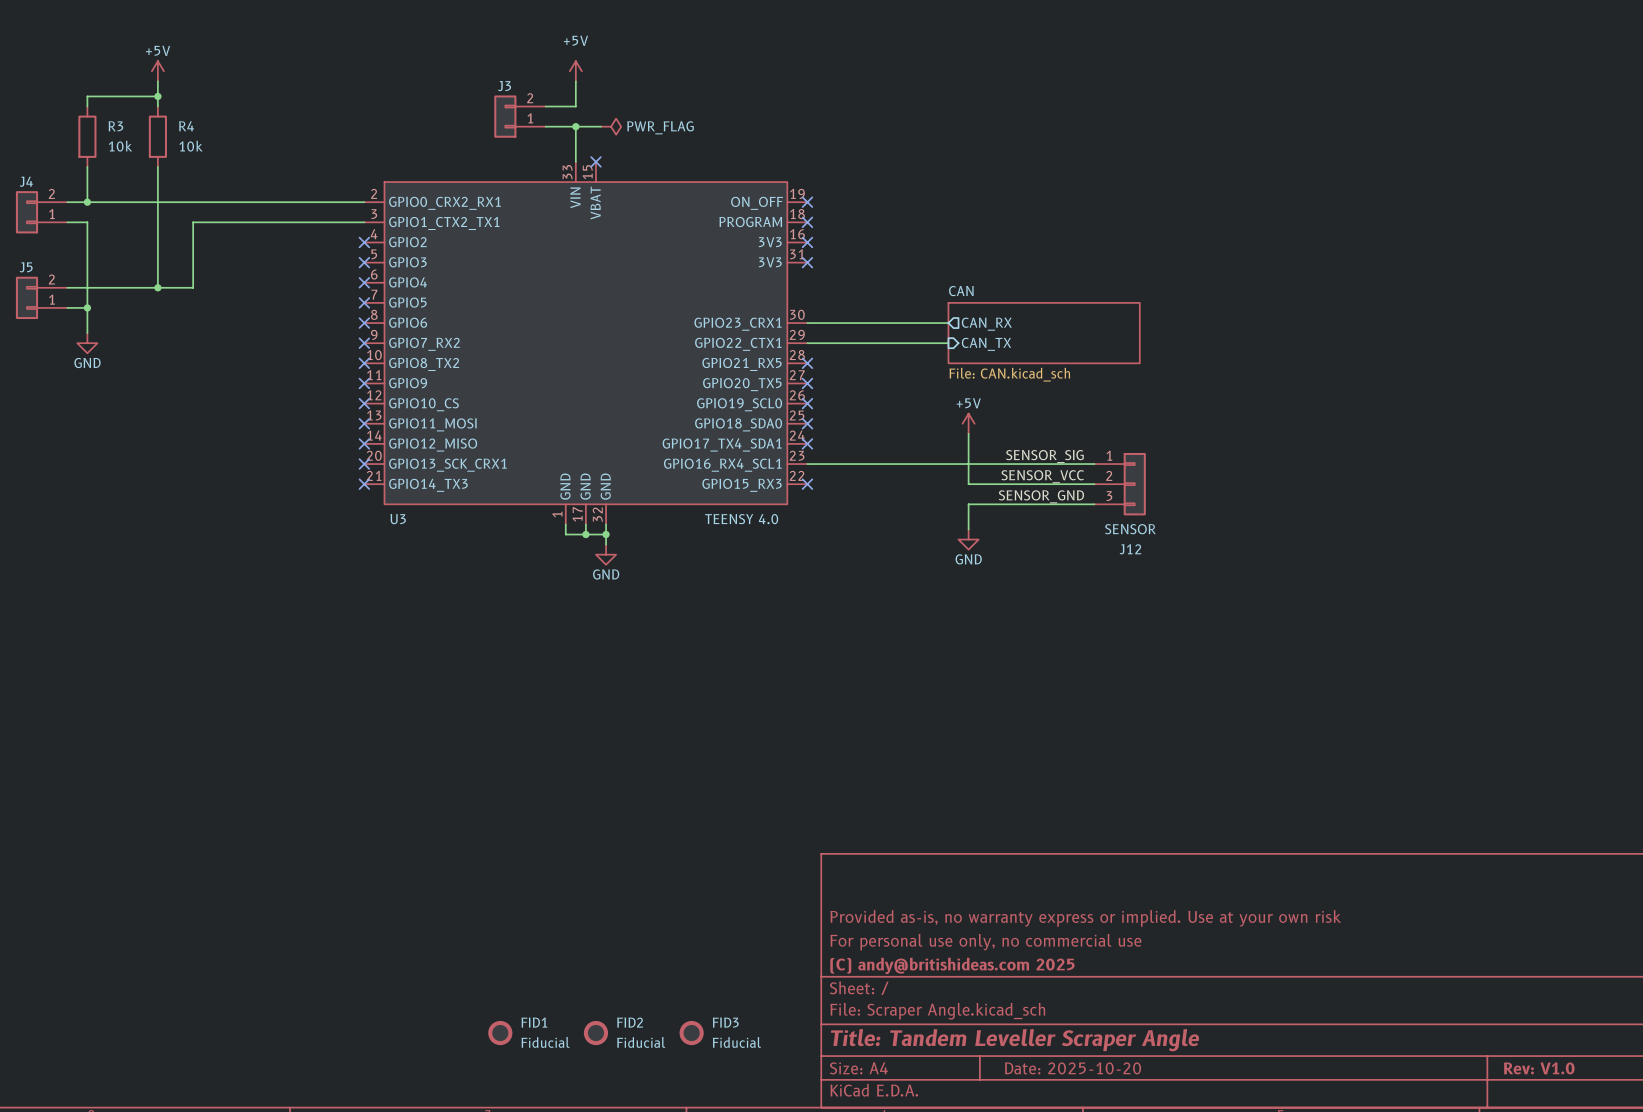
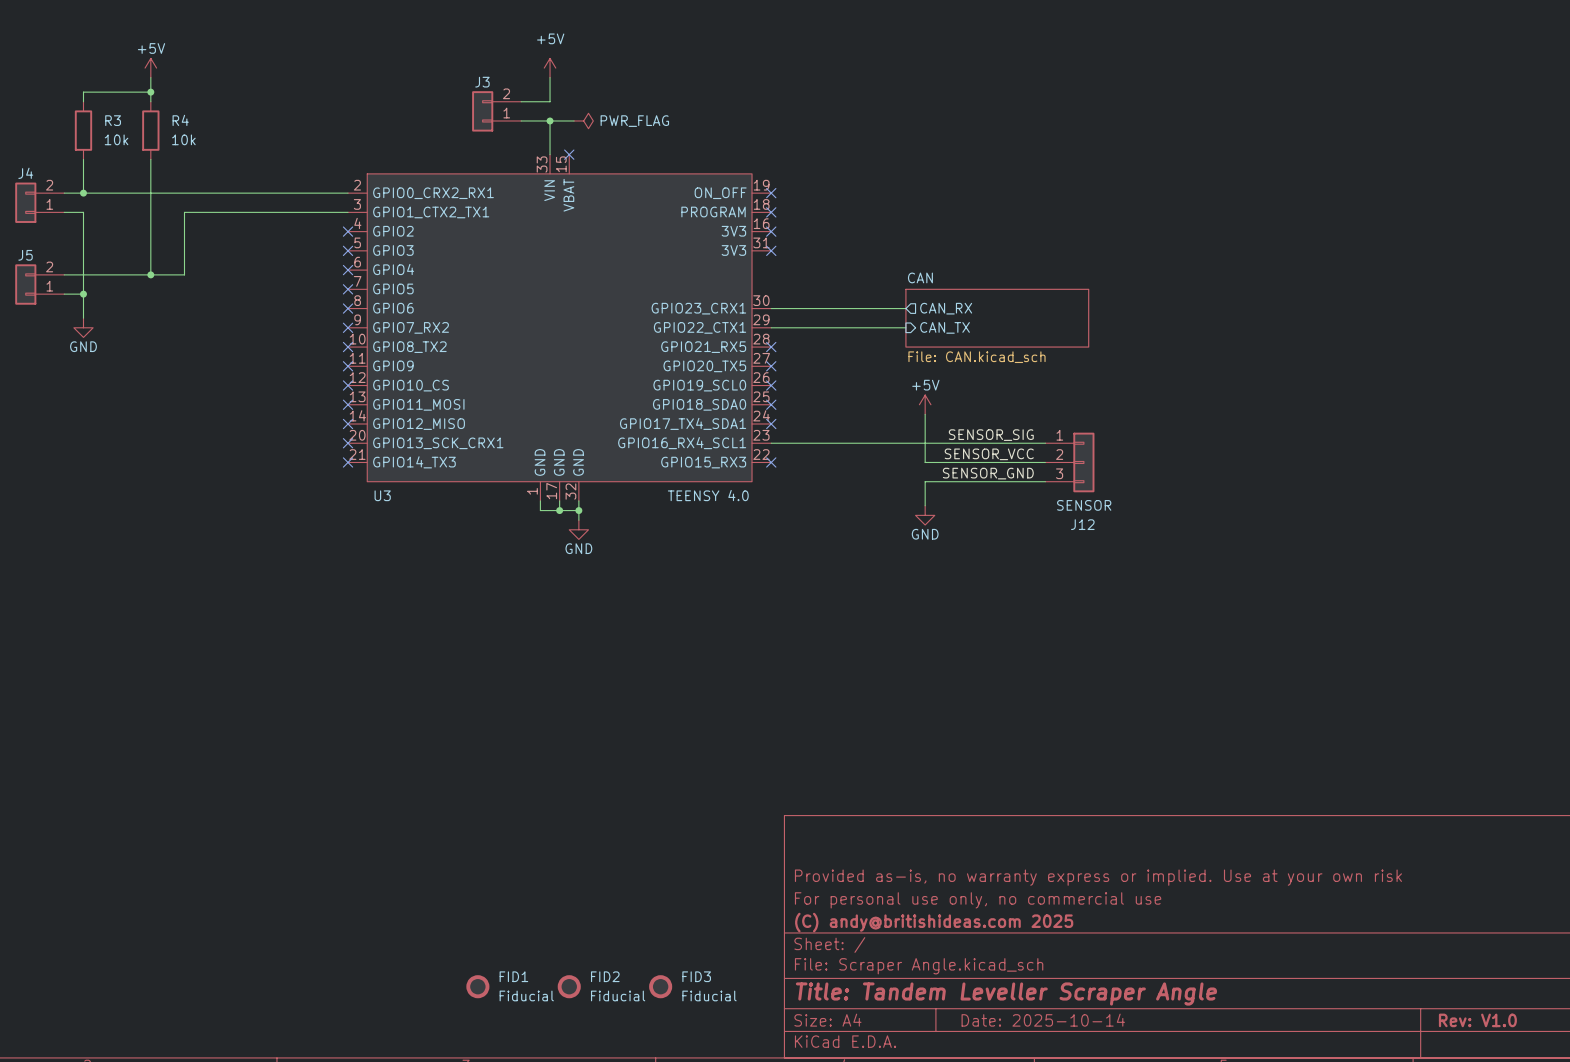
title block: Date: 2025-10-20 (1073, 1068) -> Date: 2025-10-14 (1043, 1020)

